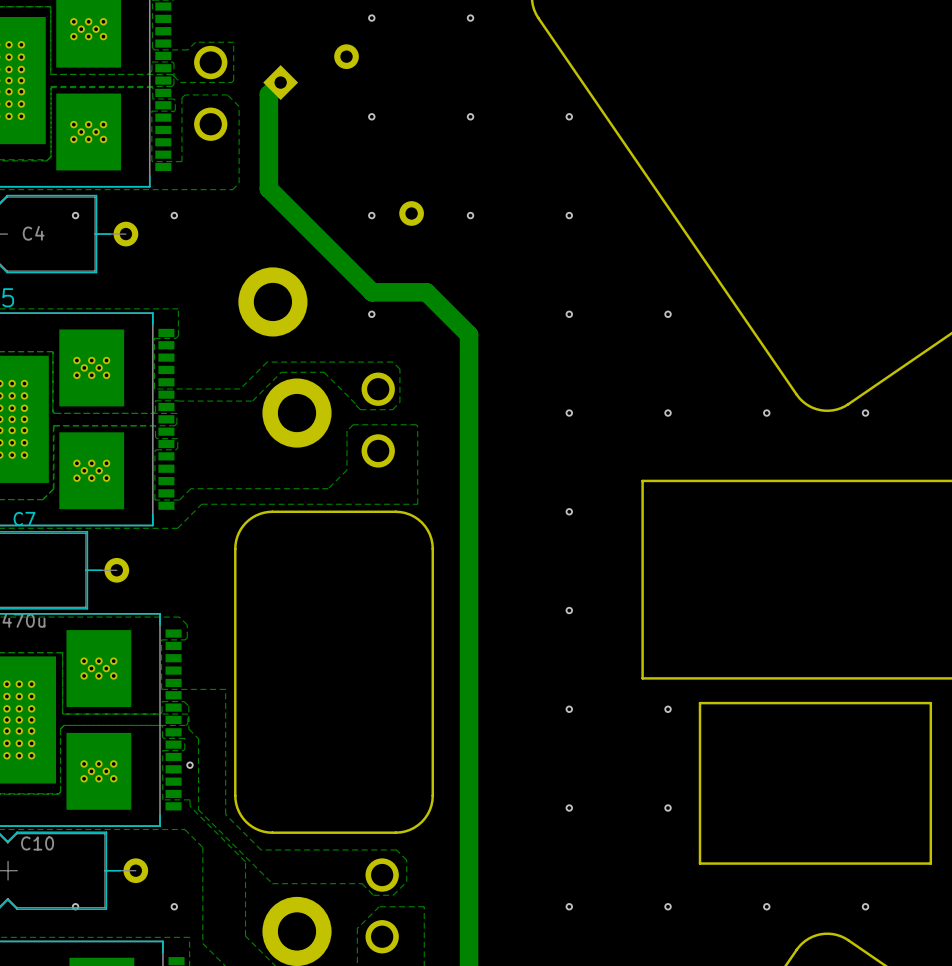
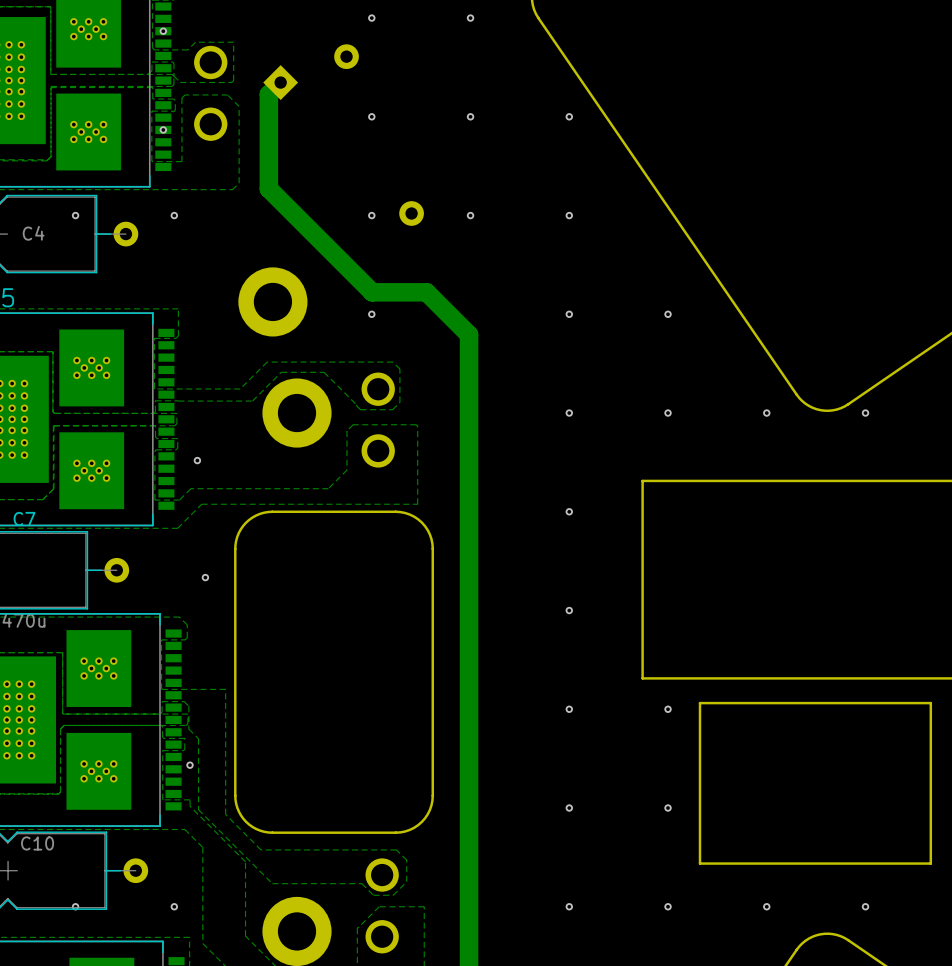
via: none -> (163, 31)
via: none -> (163, 129)
via: none -> (197, 460)
via: none -> (205, 577)

